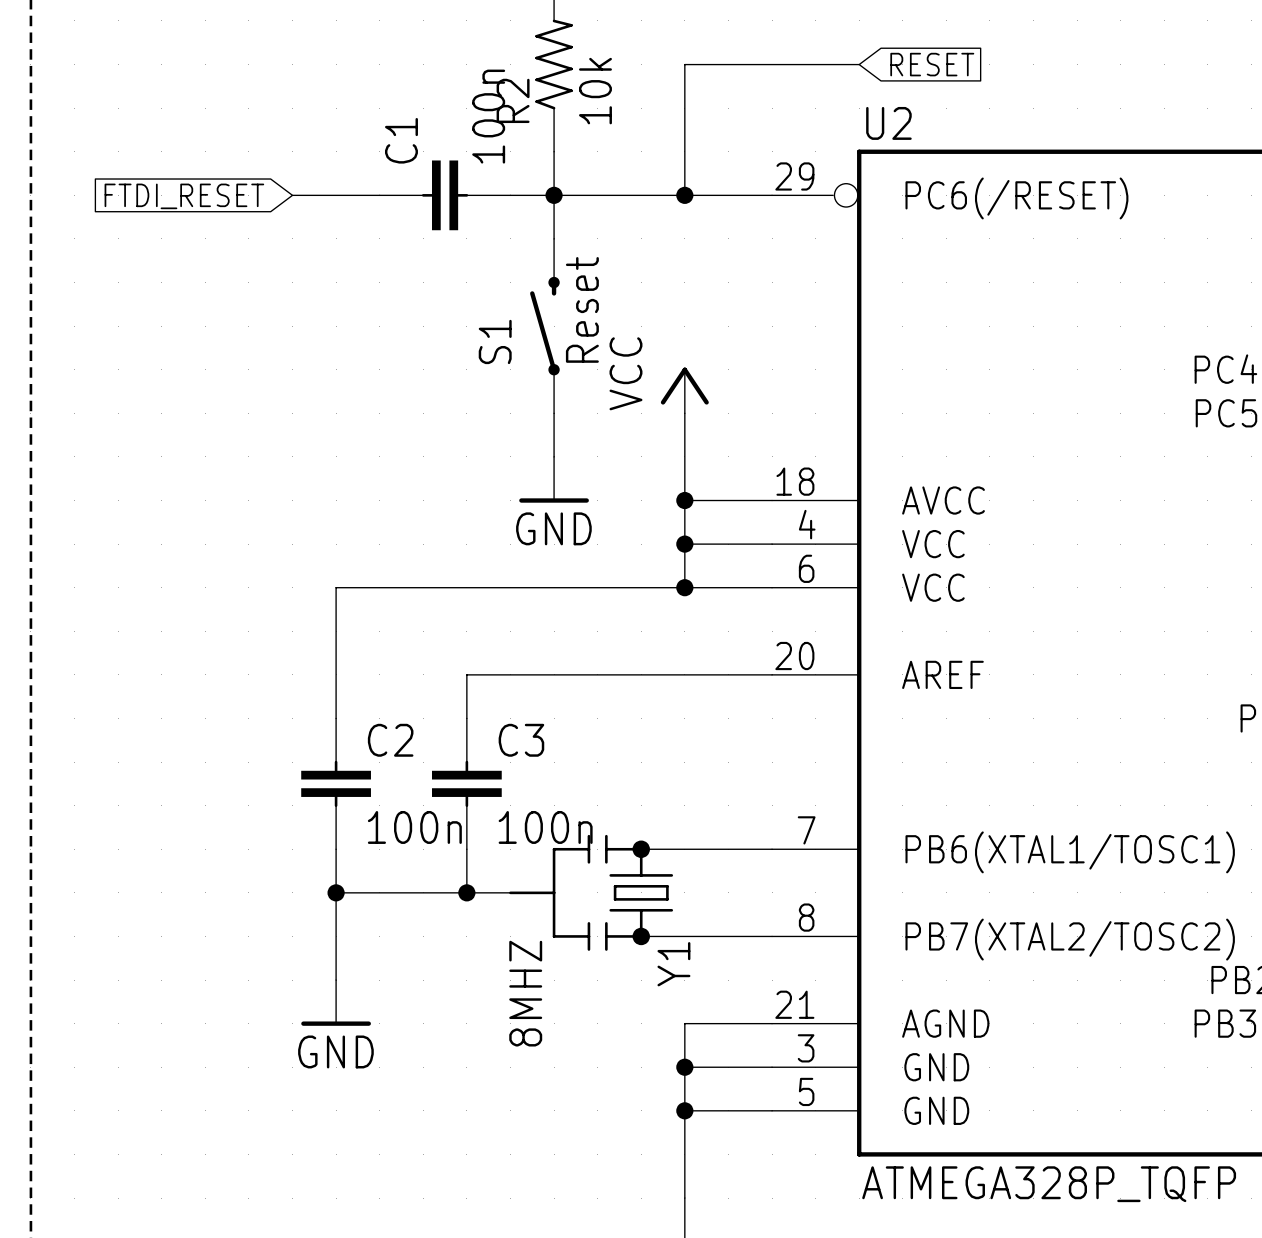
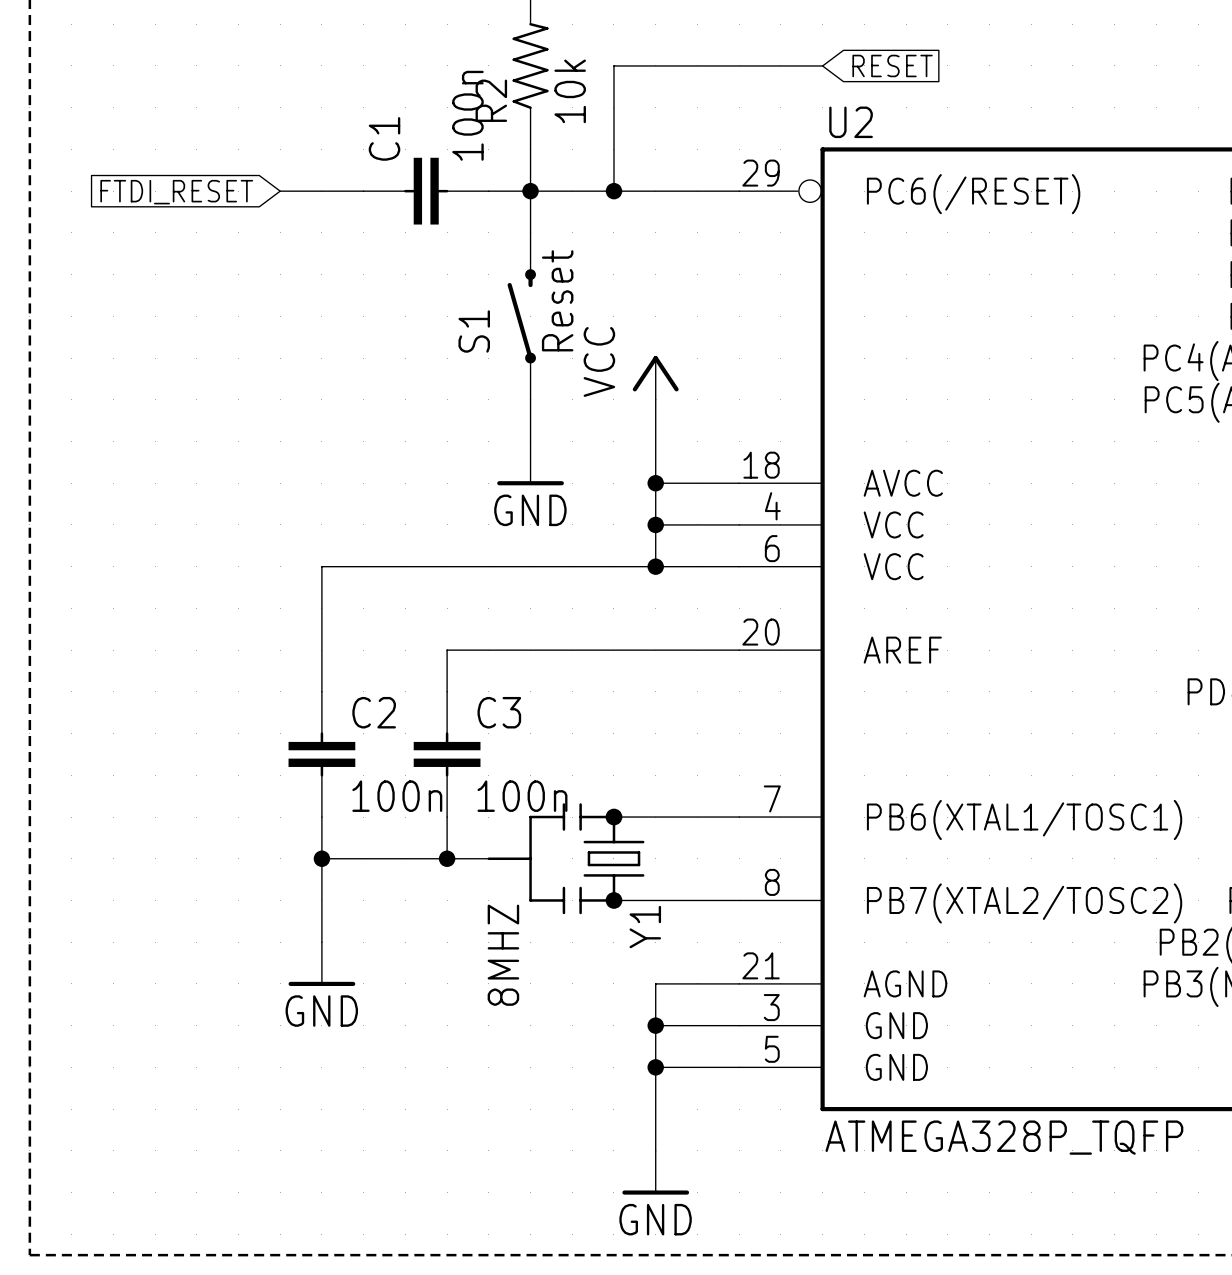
wire: (684, 64) (684, 195) -> (655, 65) (613, 65) (613, 191)
junction position: (684, 195) -> (613, 191)

